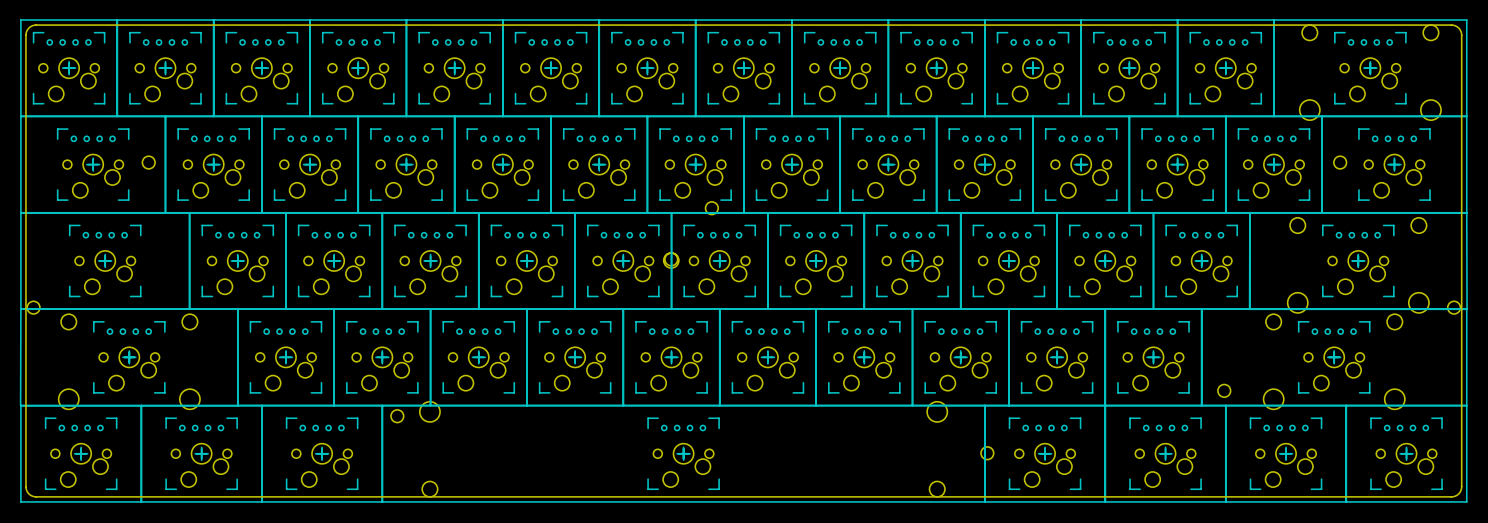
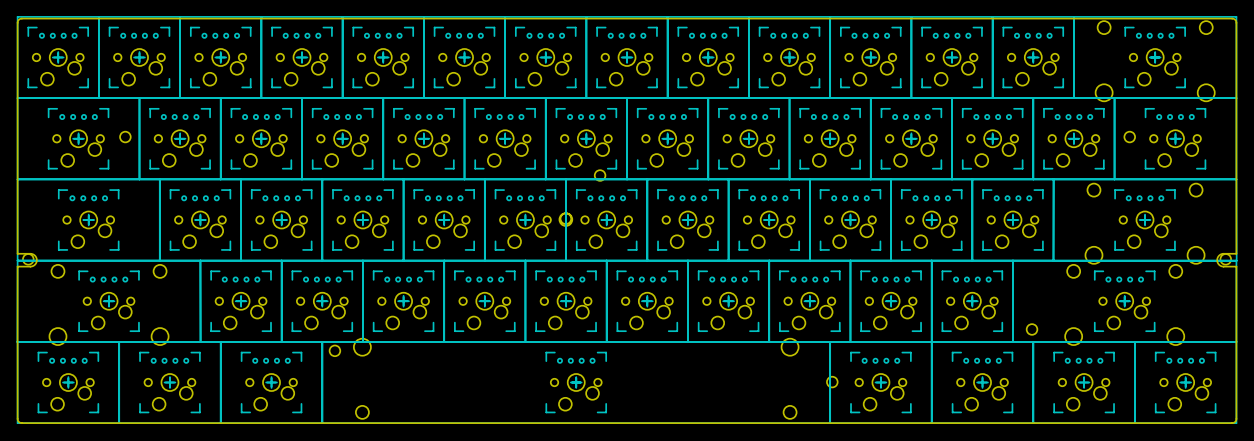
board edge: (36, 25) (1454, 25) (1459, 29) (1461, 35) (1461, 489) (1457, 494) (1451, 496) (33, 496) (28, 492) (25, 486) (25, 35) (28, 28) (36, 25) -> (21, 18) (17, 22) (17, 253) (32, 254) (36, 260) (32, 266) (17, 266) (17, 418) (20, 422) (1232, 423) (1236, 419) (1236, 266) (1221, 266) (1217, 260) (1221, 254) (1236, 253) (1236, 22) (1233, 18) (21, 18)

